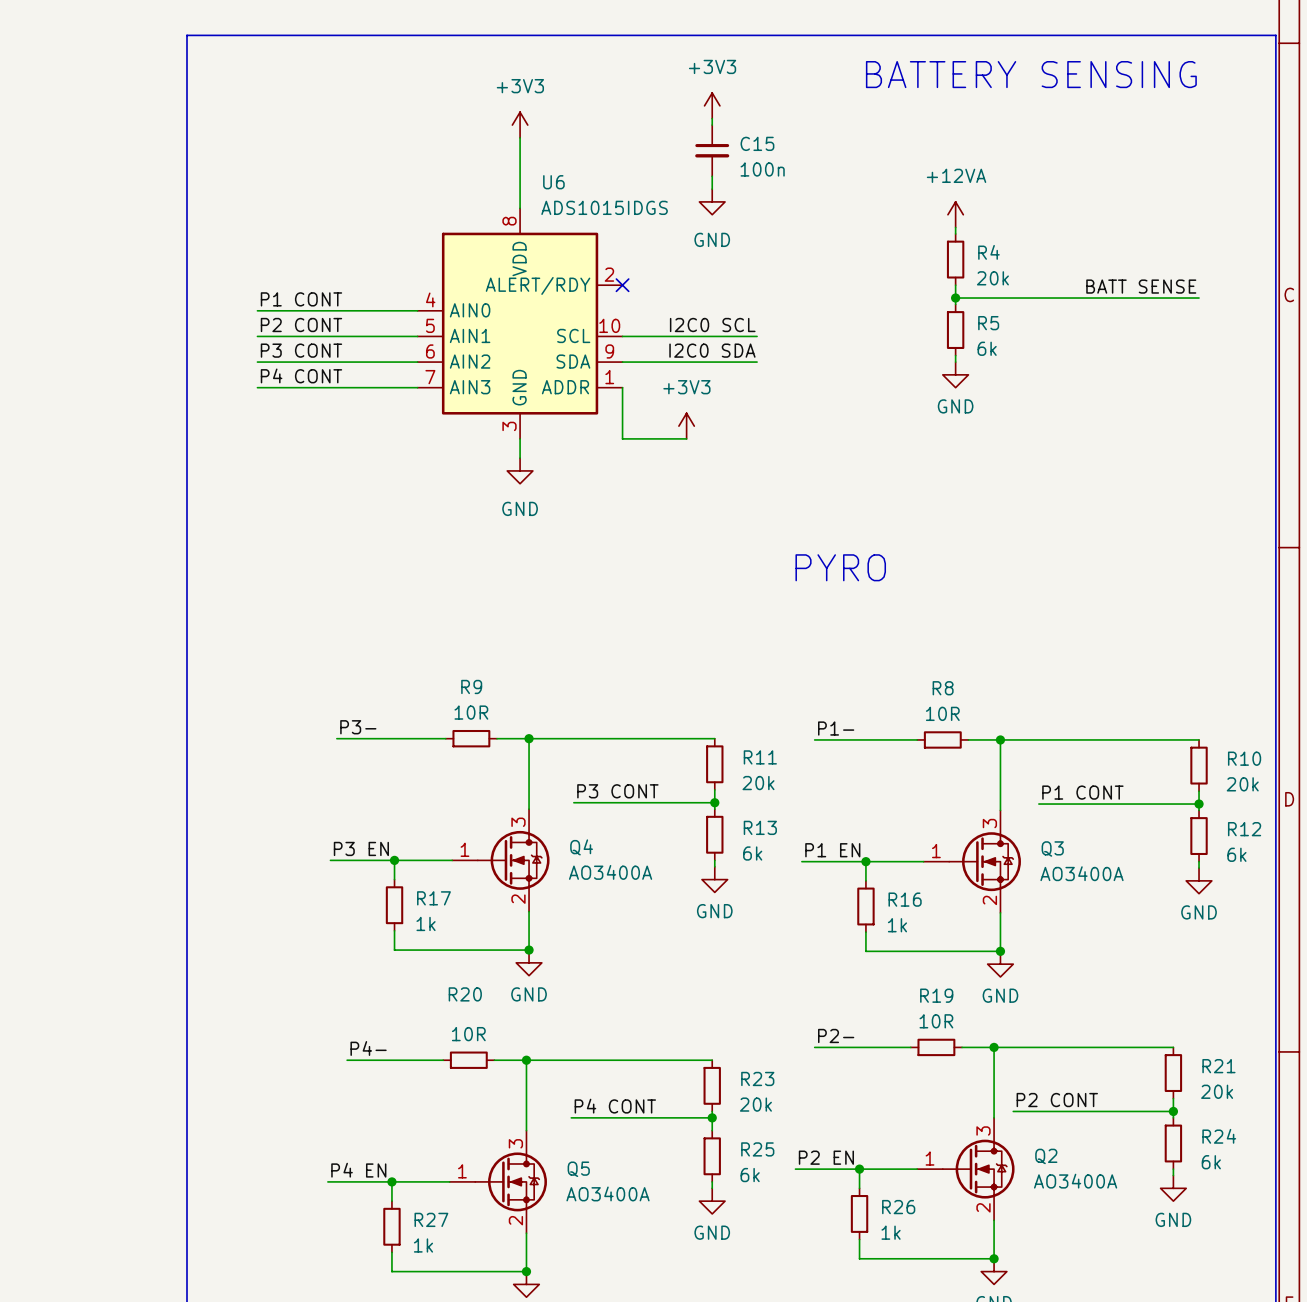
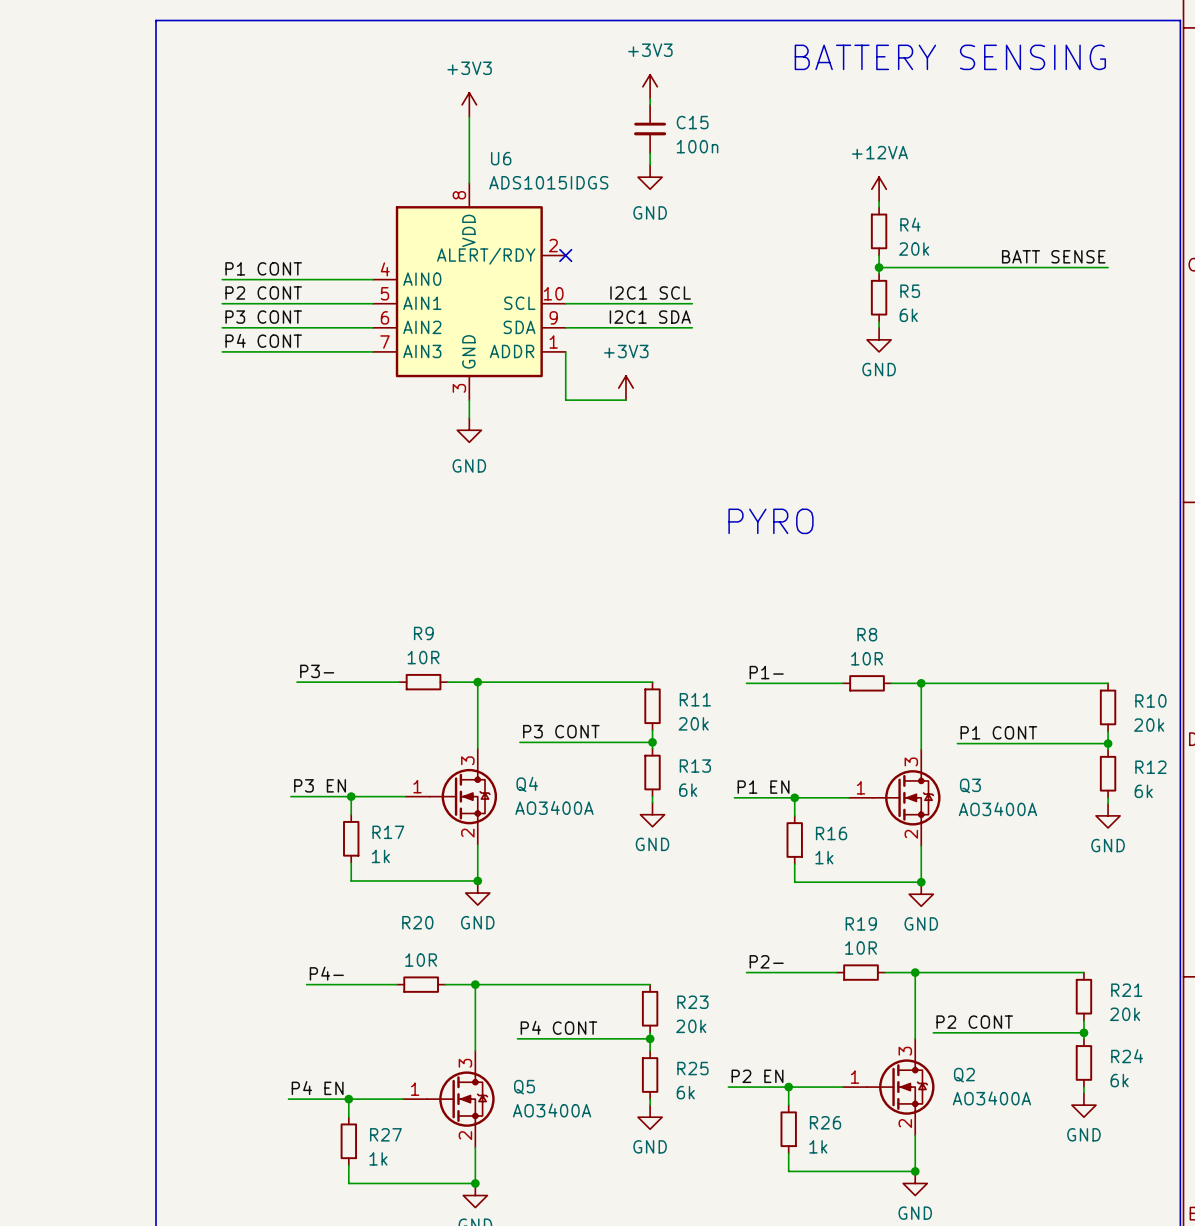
label: I2C0 SCL (712, 325) -> I2C1 SCL (650, 292)
label: I2C0 SDA (712, 350) -> I2C1 SDA (650, 317)

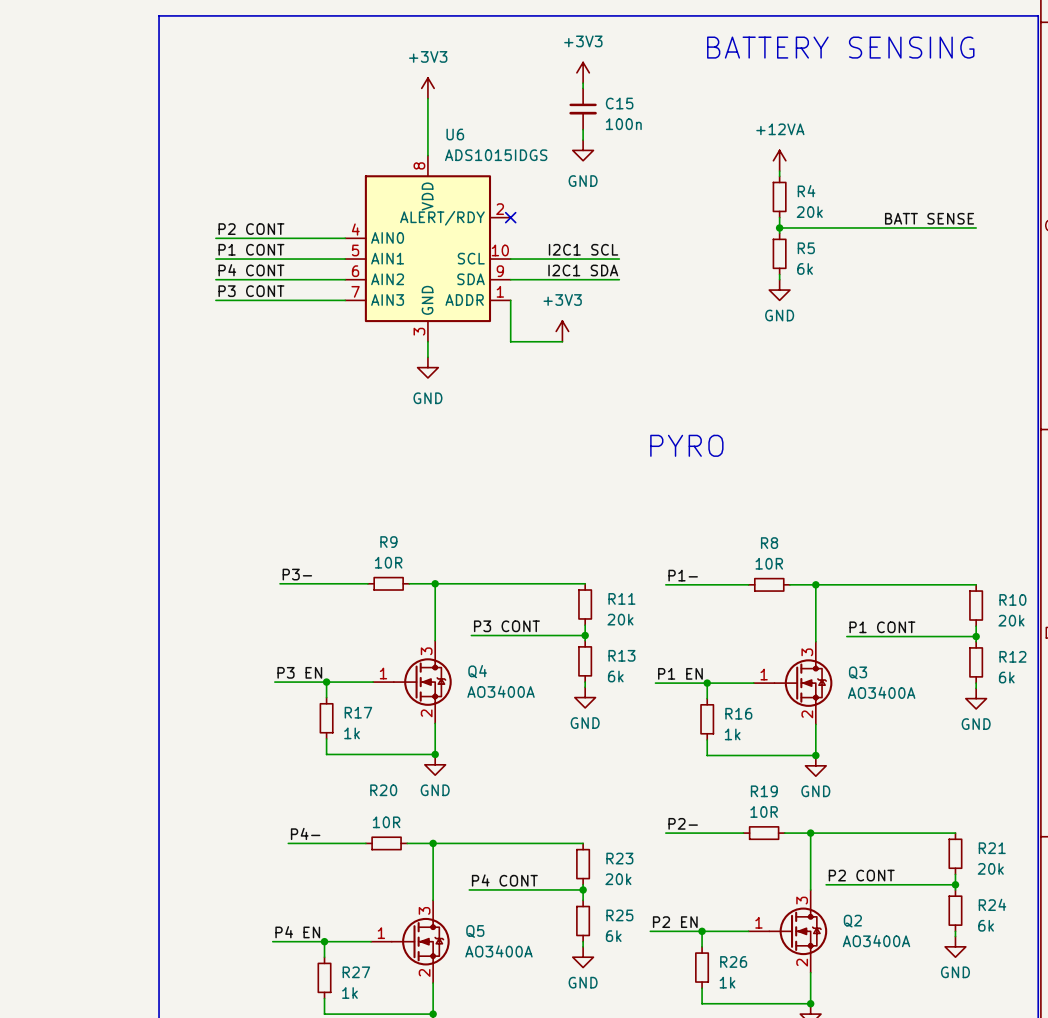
label: P1 CONT (263, 268) -> P2 CONT (251, 229)
label: P2 CONT (263, 292) -> P1 CONT (251, 249)
label: P3 CONT (263, 317) -> P4 CONT (251, 270)
label: P4 CONT (263, 340) -> P3 CONT (251, 291)

